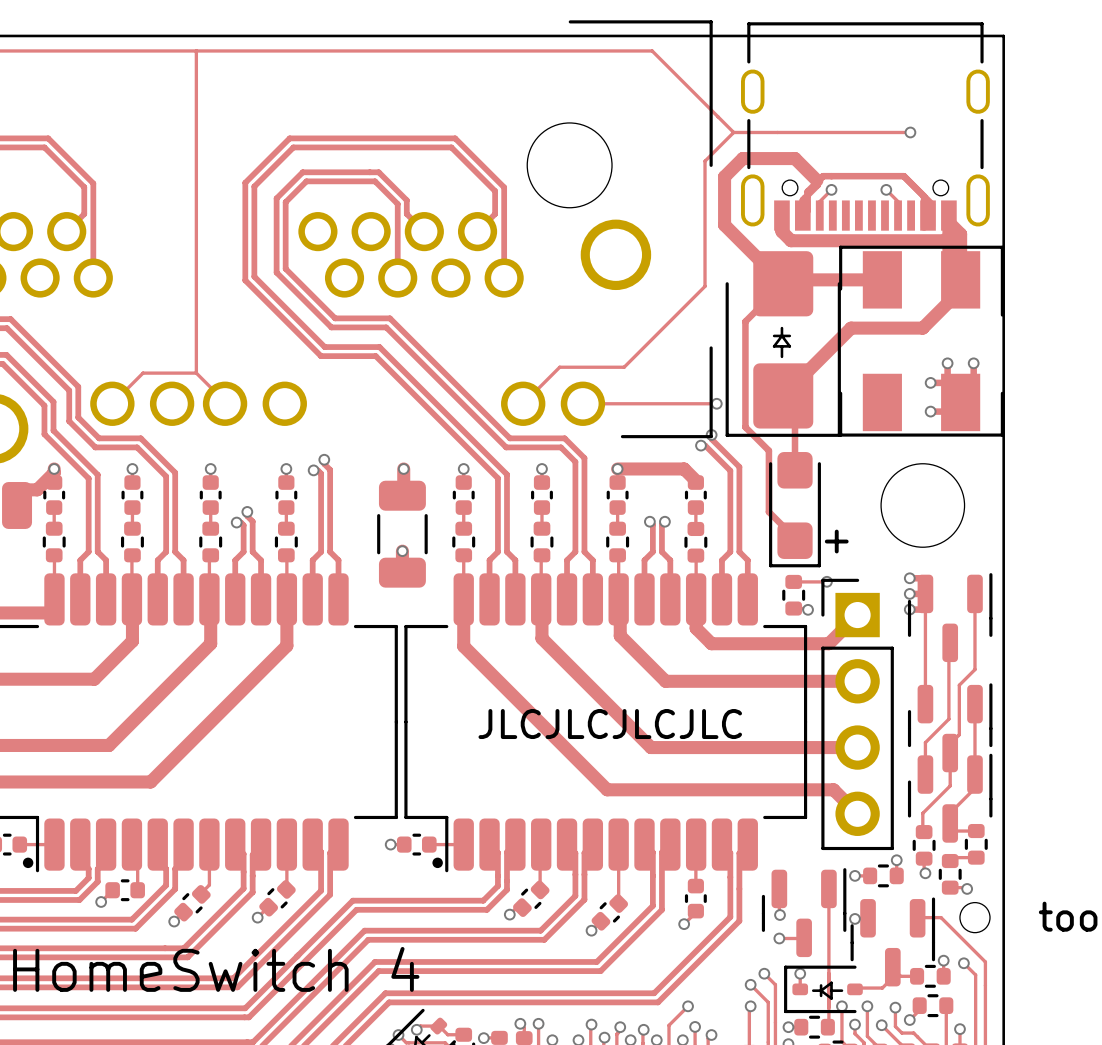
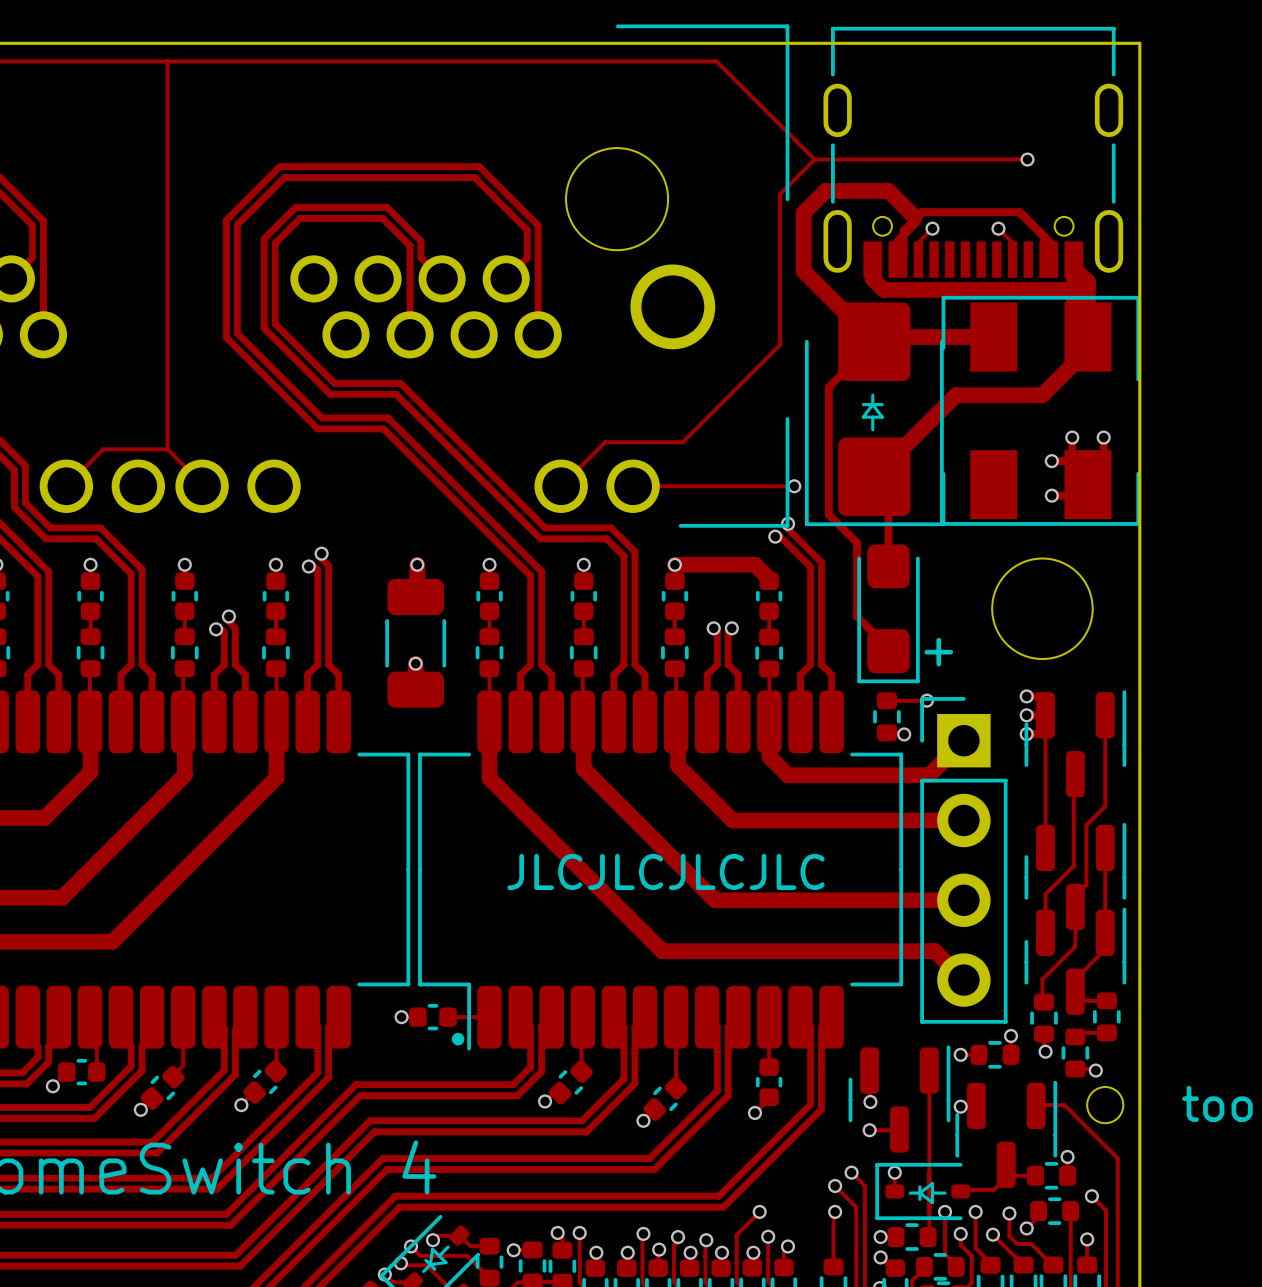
track: (963, 963) (975, 975) (975, 1005) -> (1091, 1196) (1106, 1210)
via position: (963, 963) -> (1091, 1196)

